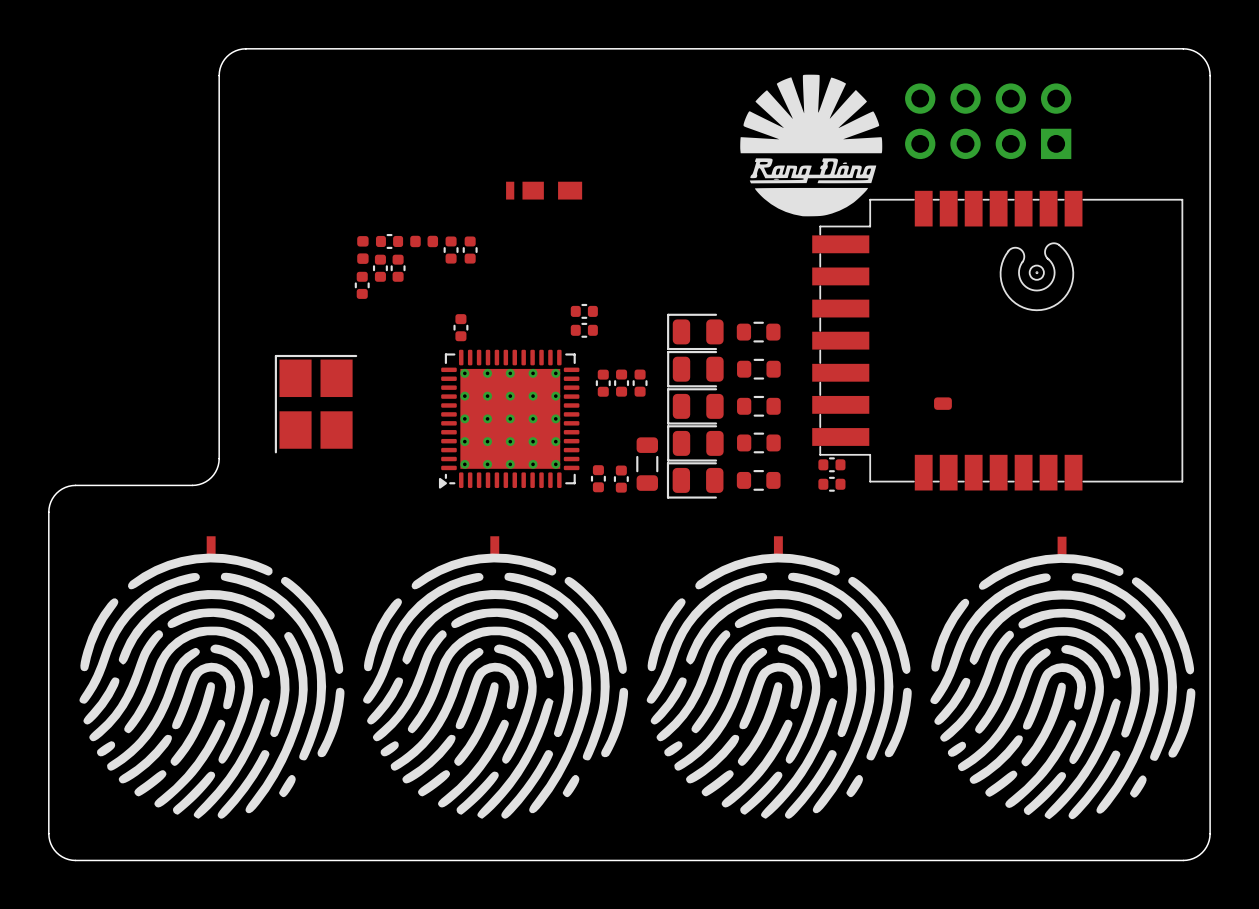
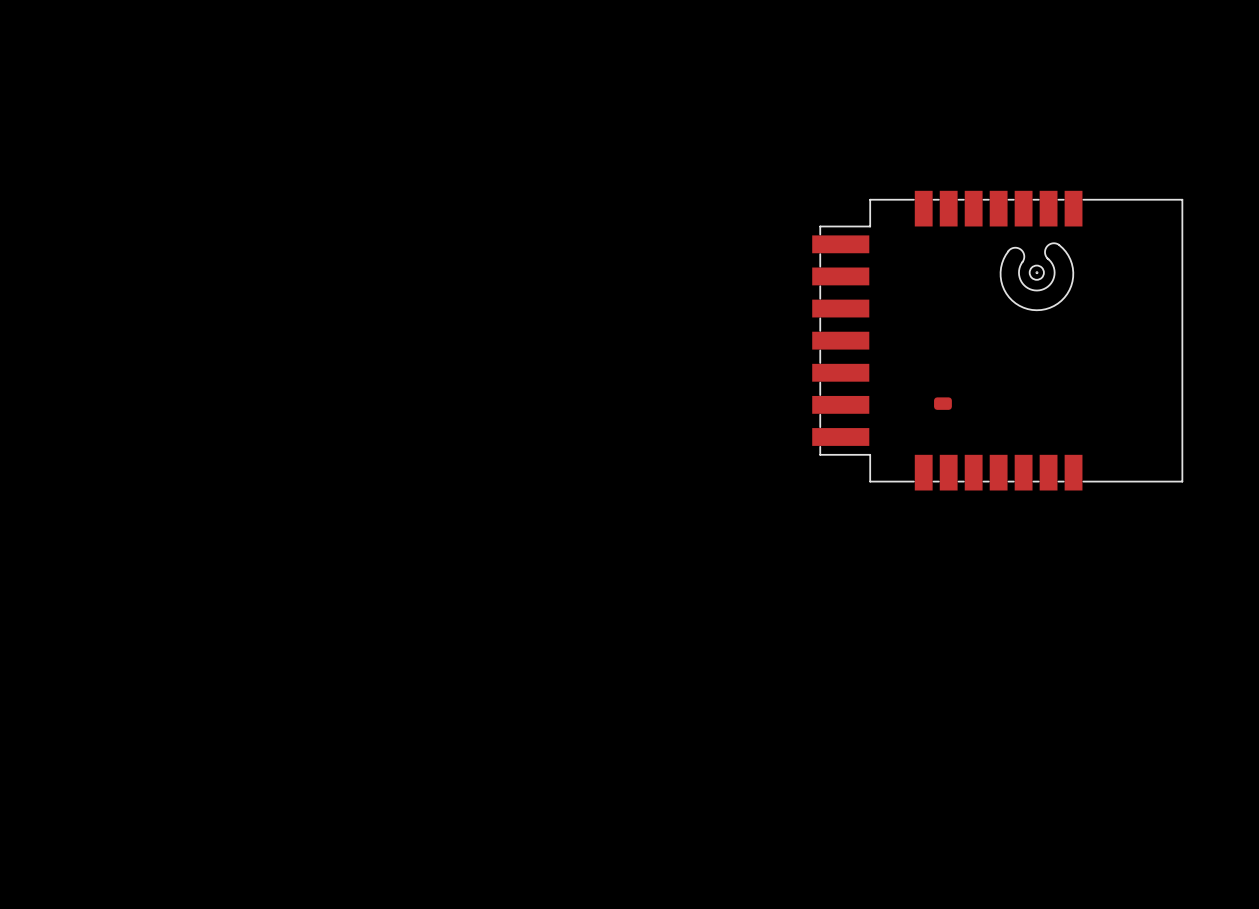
board edge: (245, 48) (1183, 48) (1199, 54) (1206, 62) (1210, 75) (1210, 833) (1204, 849) (1196, 856) (1183, 860) (75, 860) (59, 854) (52, 847) (48, 833) (49, 505) (56, 493) (68, 486) (195, 485) (208, 479) (217, 468) (219, 458) (219, 72) (227, 56) (235, 50) (245, 48) -> none
drawing: [740, 74, 883, 217] -> none
part: (988, 121) -> none
part: (544, 190) -> none
part: (389, 241) -> none
part: (424, 241) -> none
part: (362, 249) -> none
part: (451, 250) -> none
part: (470, 250) -> none
part: (380, 268) -> none
part: (398, 268) -> none
part: (362, 285) -> none
part: (584, 311) -> none
part: (460, 327) -> none
part: (584, 330) -> none
part: (695, 331) -> none
part: (758, 332) -> none
part: (695, 369) -> none
part: (758, 369) -> none
part: (603, 383) -> none
part: (621, 383) -> none
part: (640, 383) -> none
part: (316, 404) -> none
part: (695, 406) -> none
part: (758, 406) -> none
part: (509, 419) -> none
part: (758, 442) -> none
part: (695, 443) -> none
part: (647, 464) -> none
part: (831, 464) -> none
part: (598, 478) -> none
part: (621, 479) -> none
part: (695, 480) -> none
part: (758, 480) -> none
part: (831, 484) -> none
part: (211, 545) -> none
part: (494, 545) -> none
part: (778, 545) -> none
part: (1062, 545) -> none
drawing: [79, 553, 1196, 820] -> none

